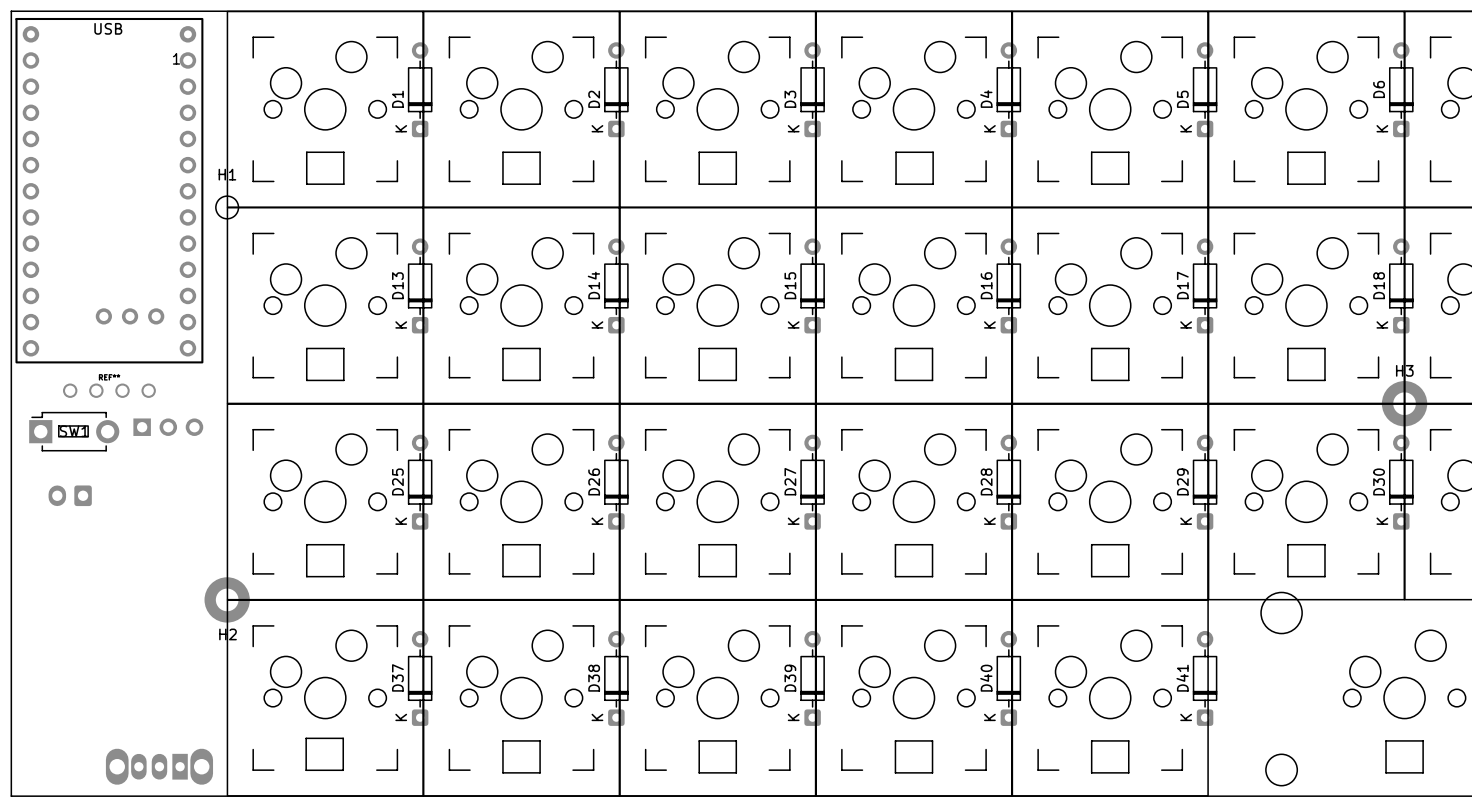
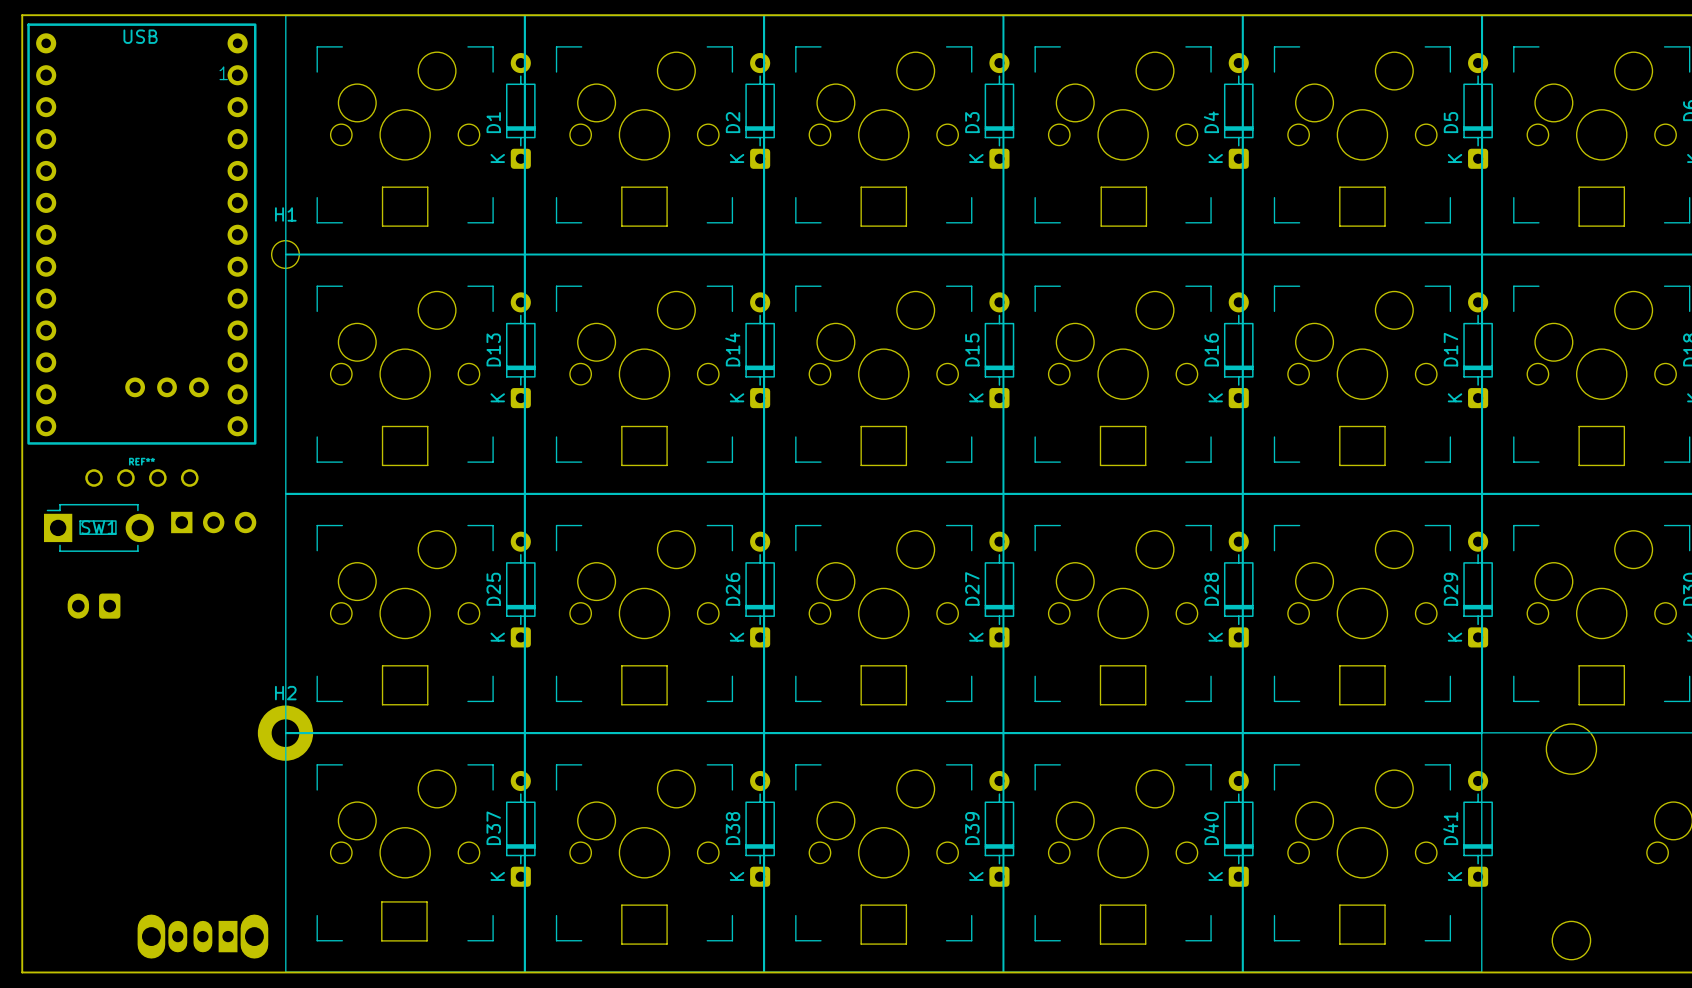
H2 name position: H2 (228, 634) -> H2 (285, 693)

